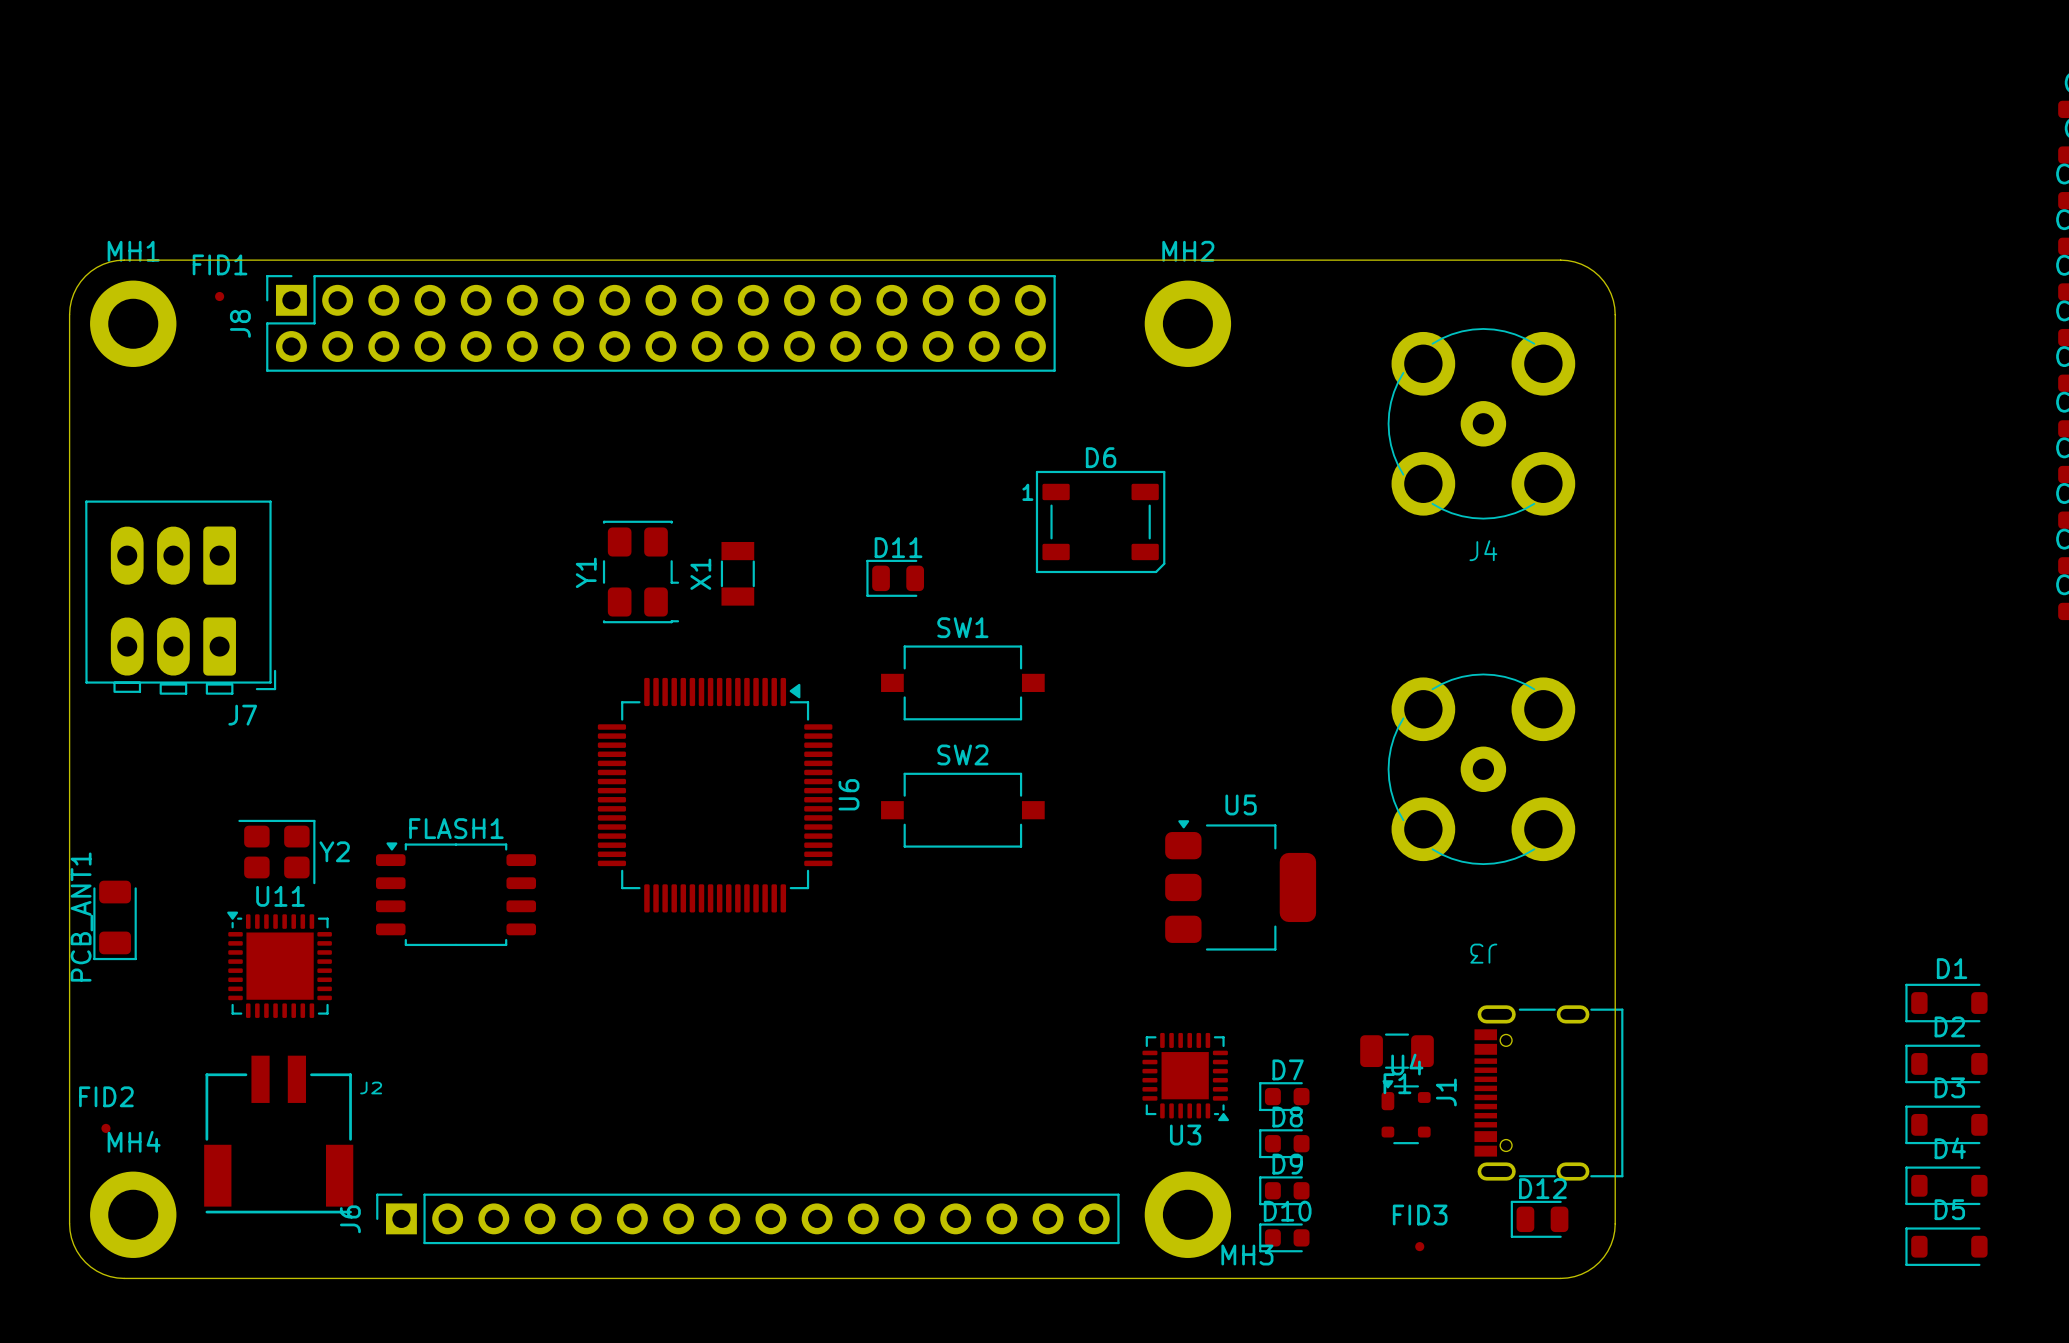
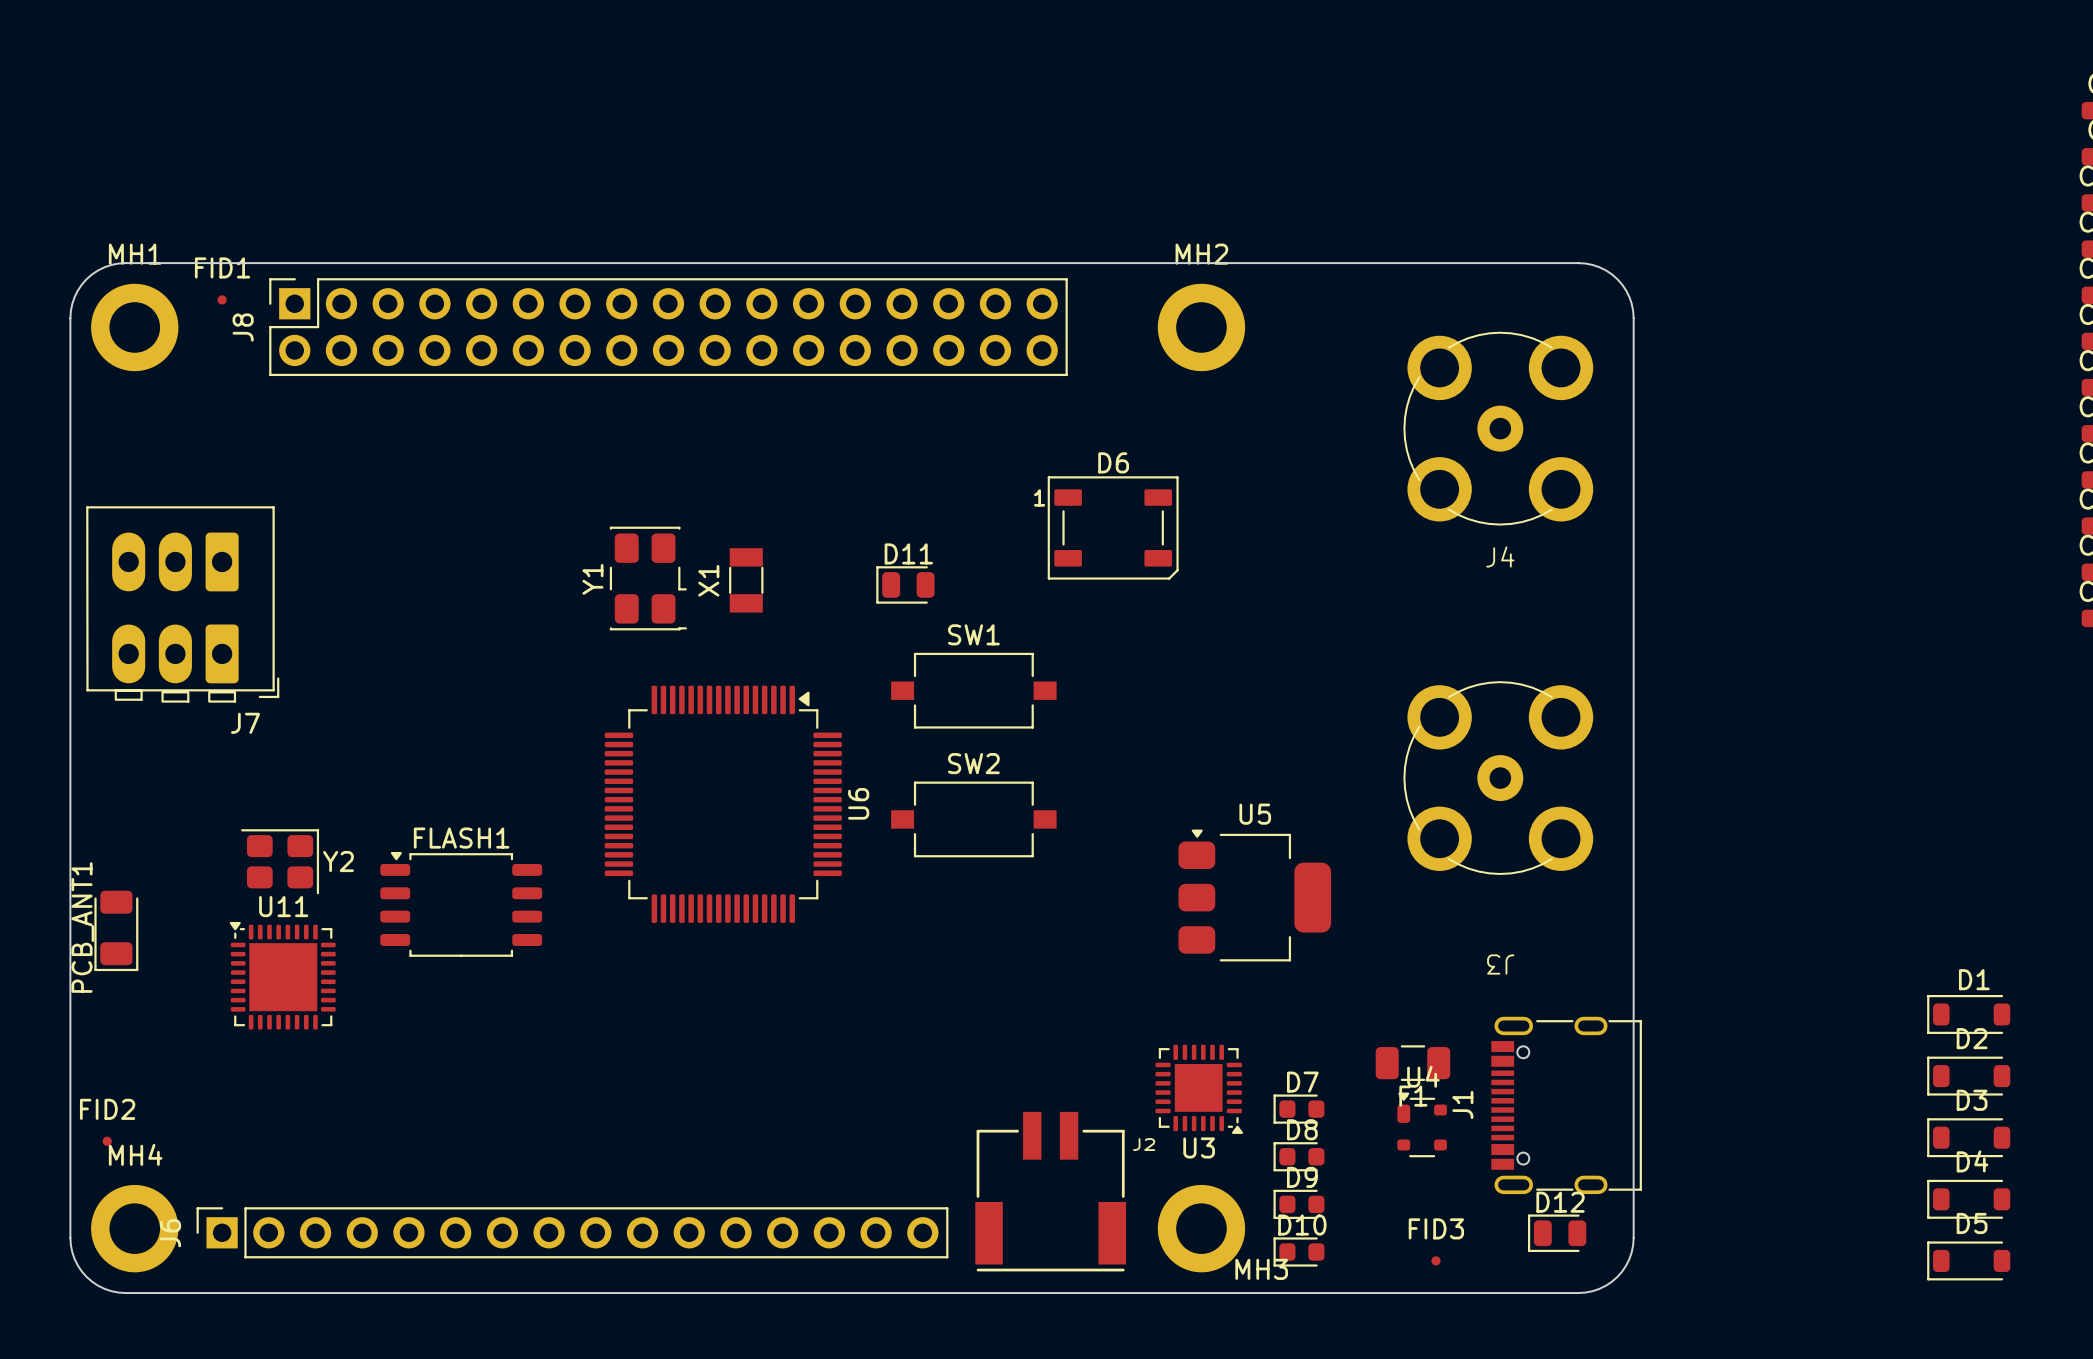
J2 position: (278, 1134) -> (1050, 1191)
J6 position: (747, 1218) -> (572, 1232)

